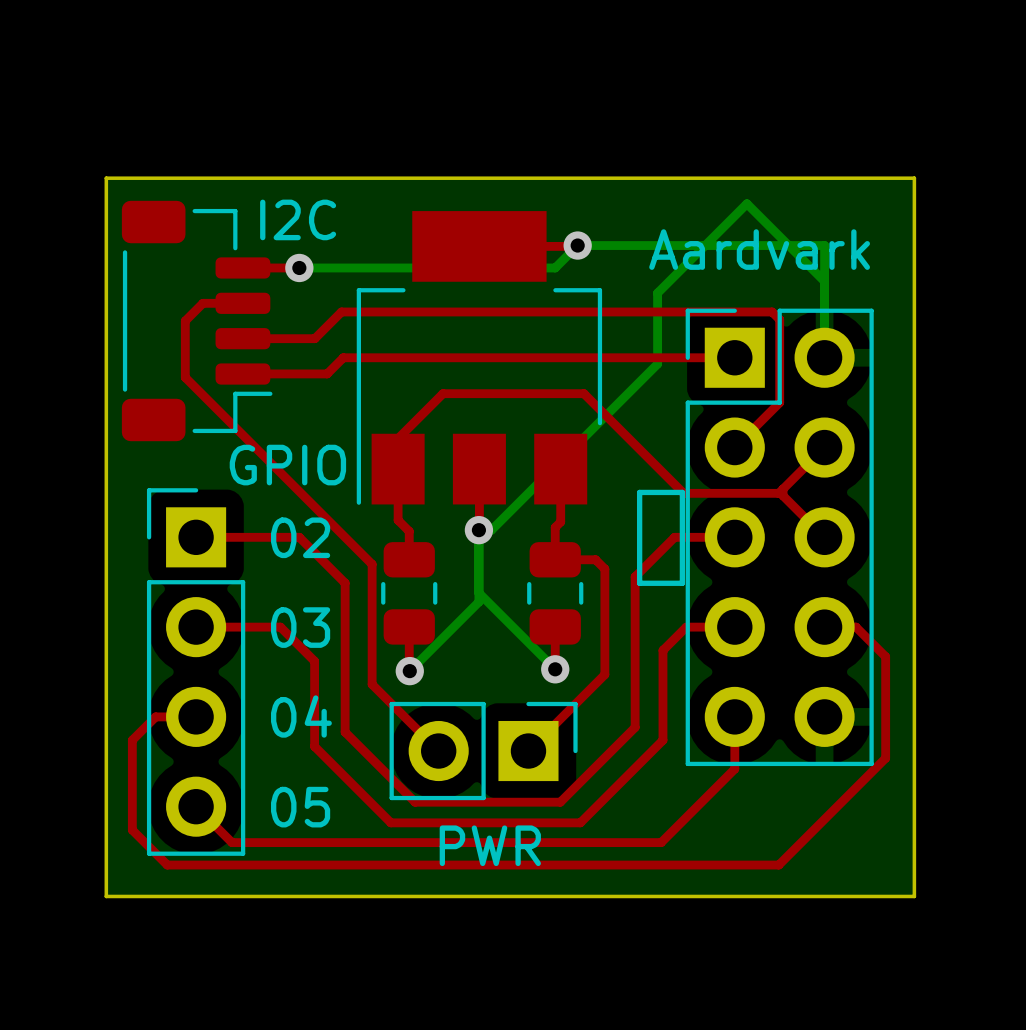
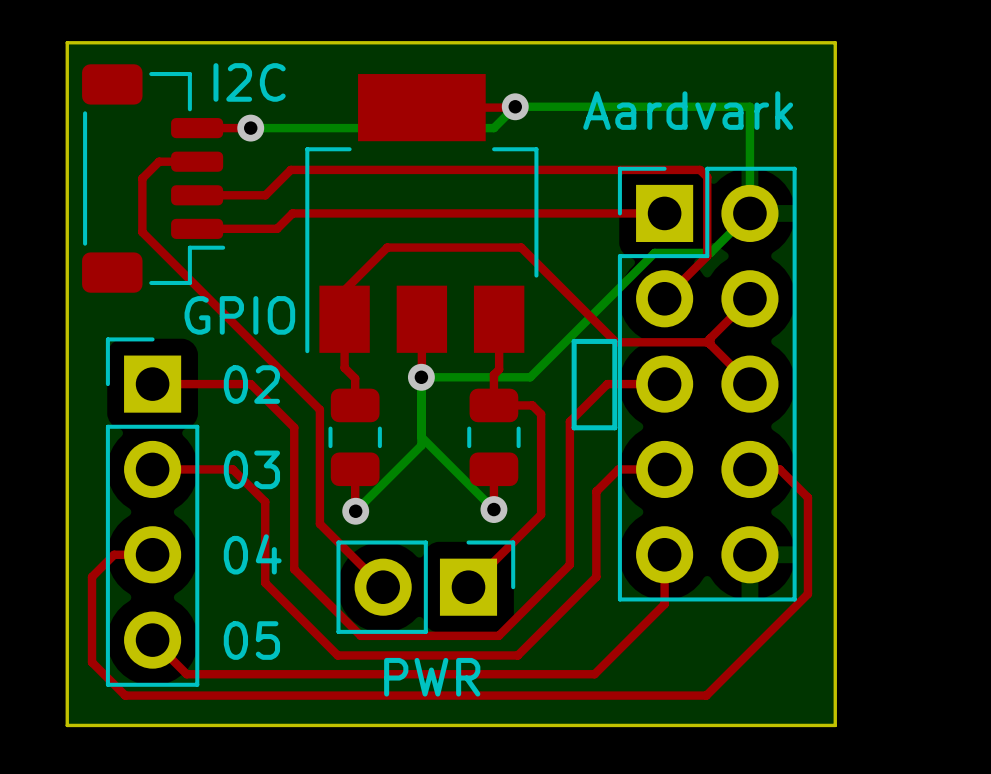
bottom track: (824, 281) (746, 203) (657, 293) (657, 364) (491, 530) -> (749, 213) (710, 252) (654, 252) (530, 377) (433, 377)

